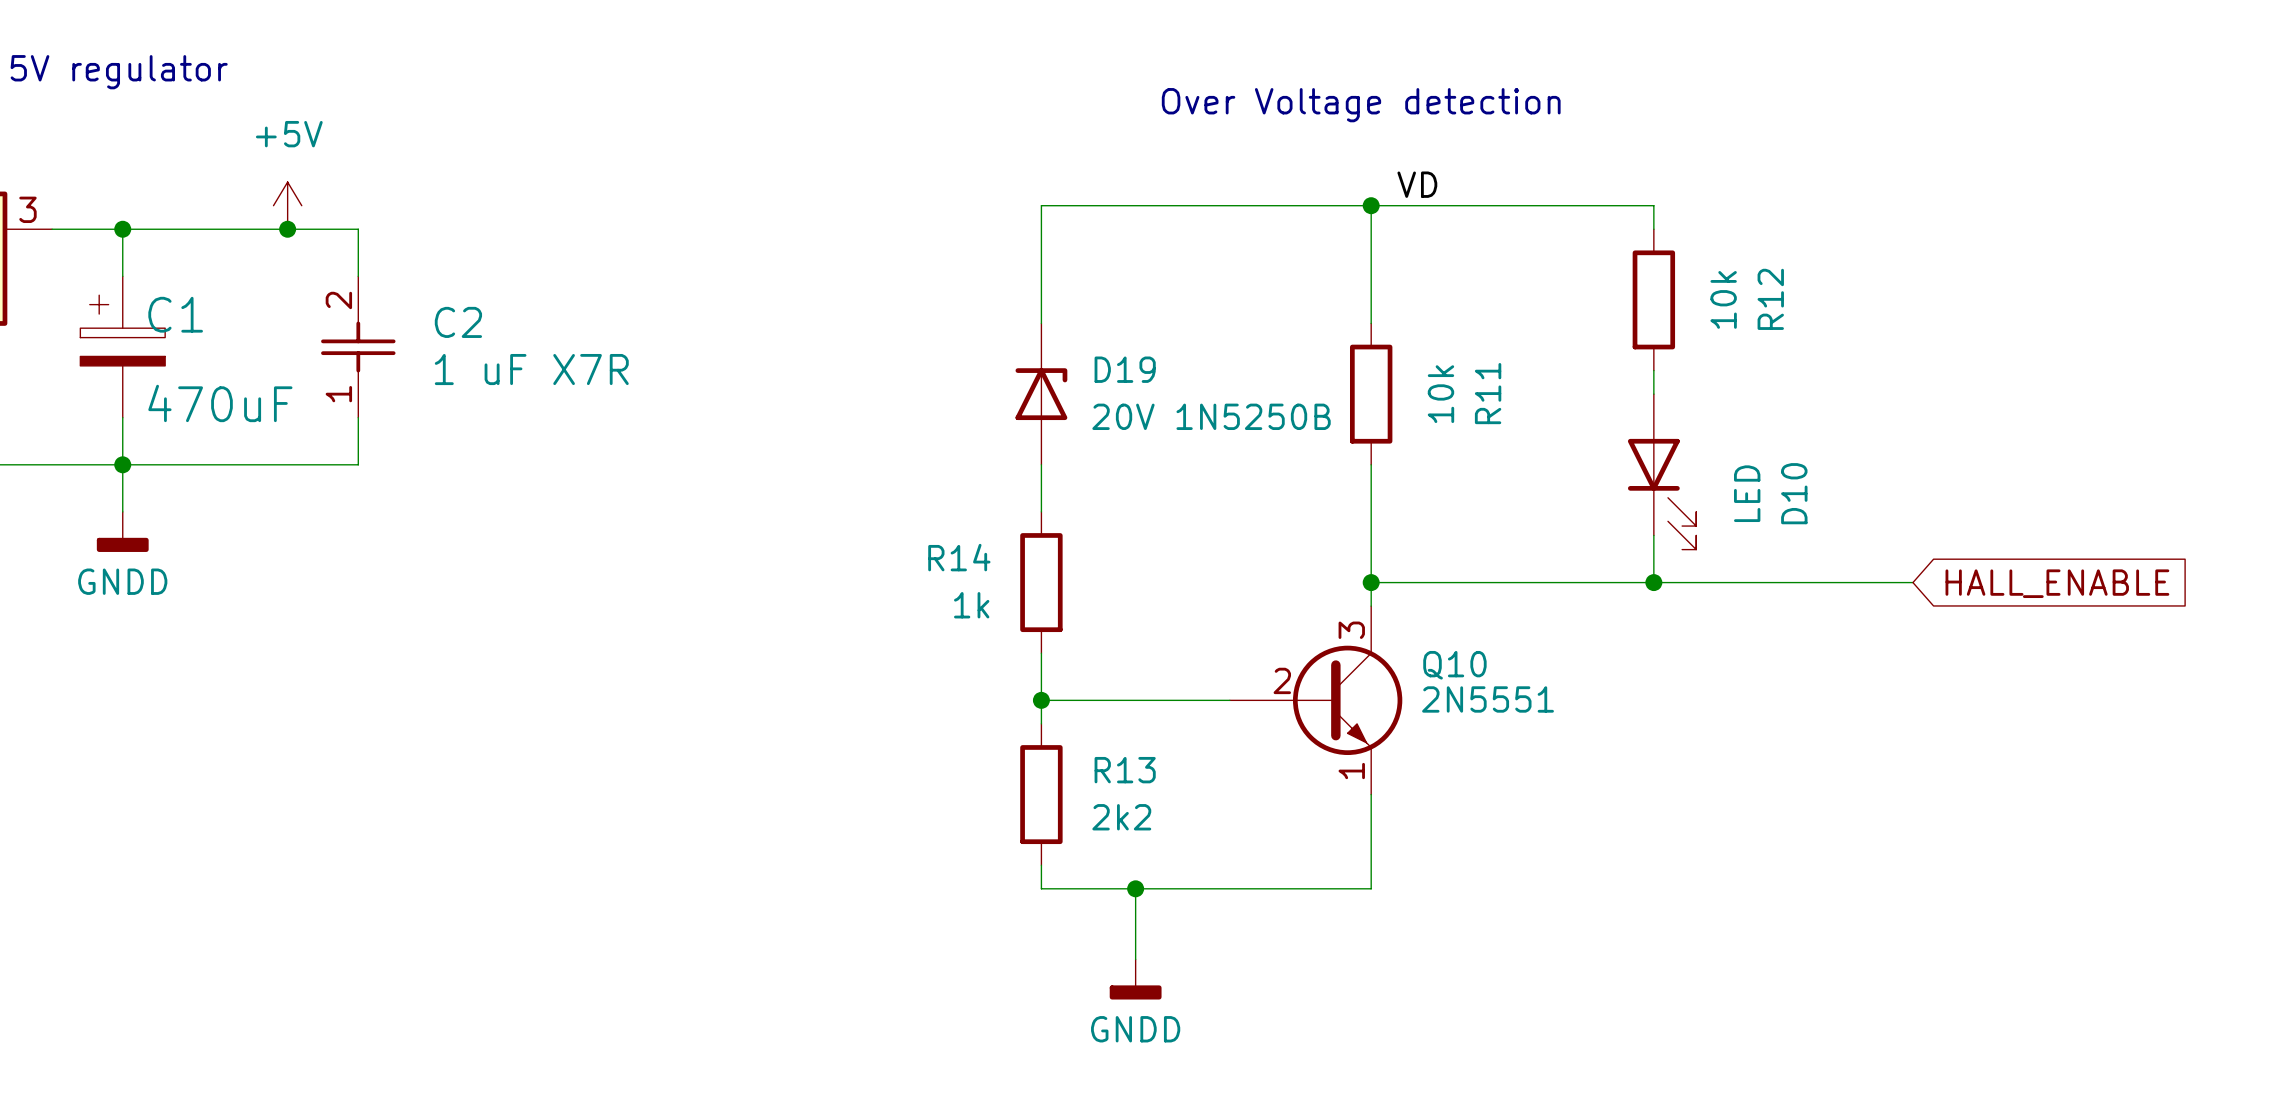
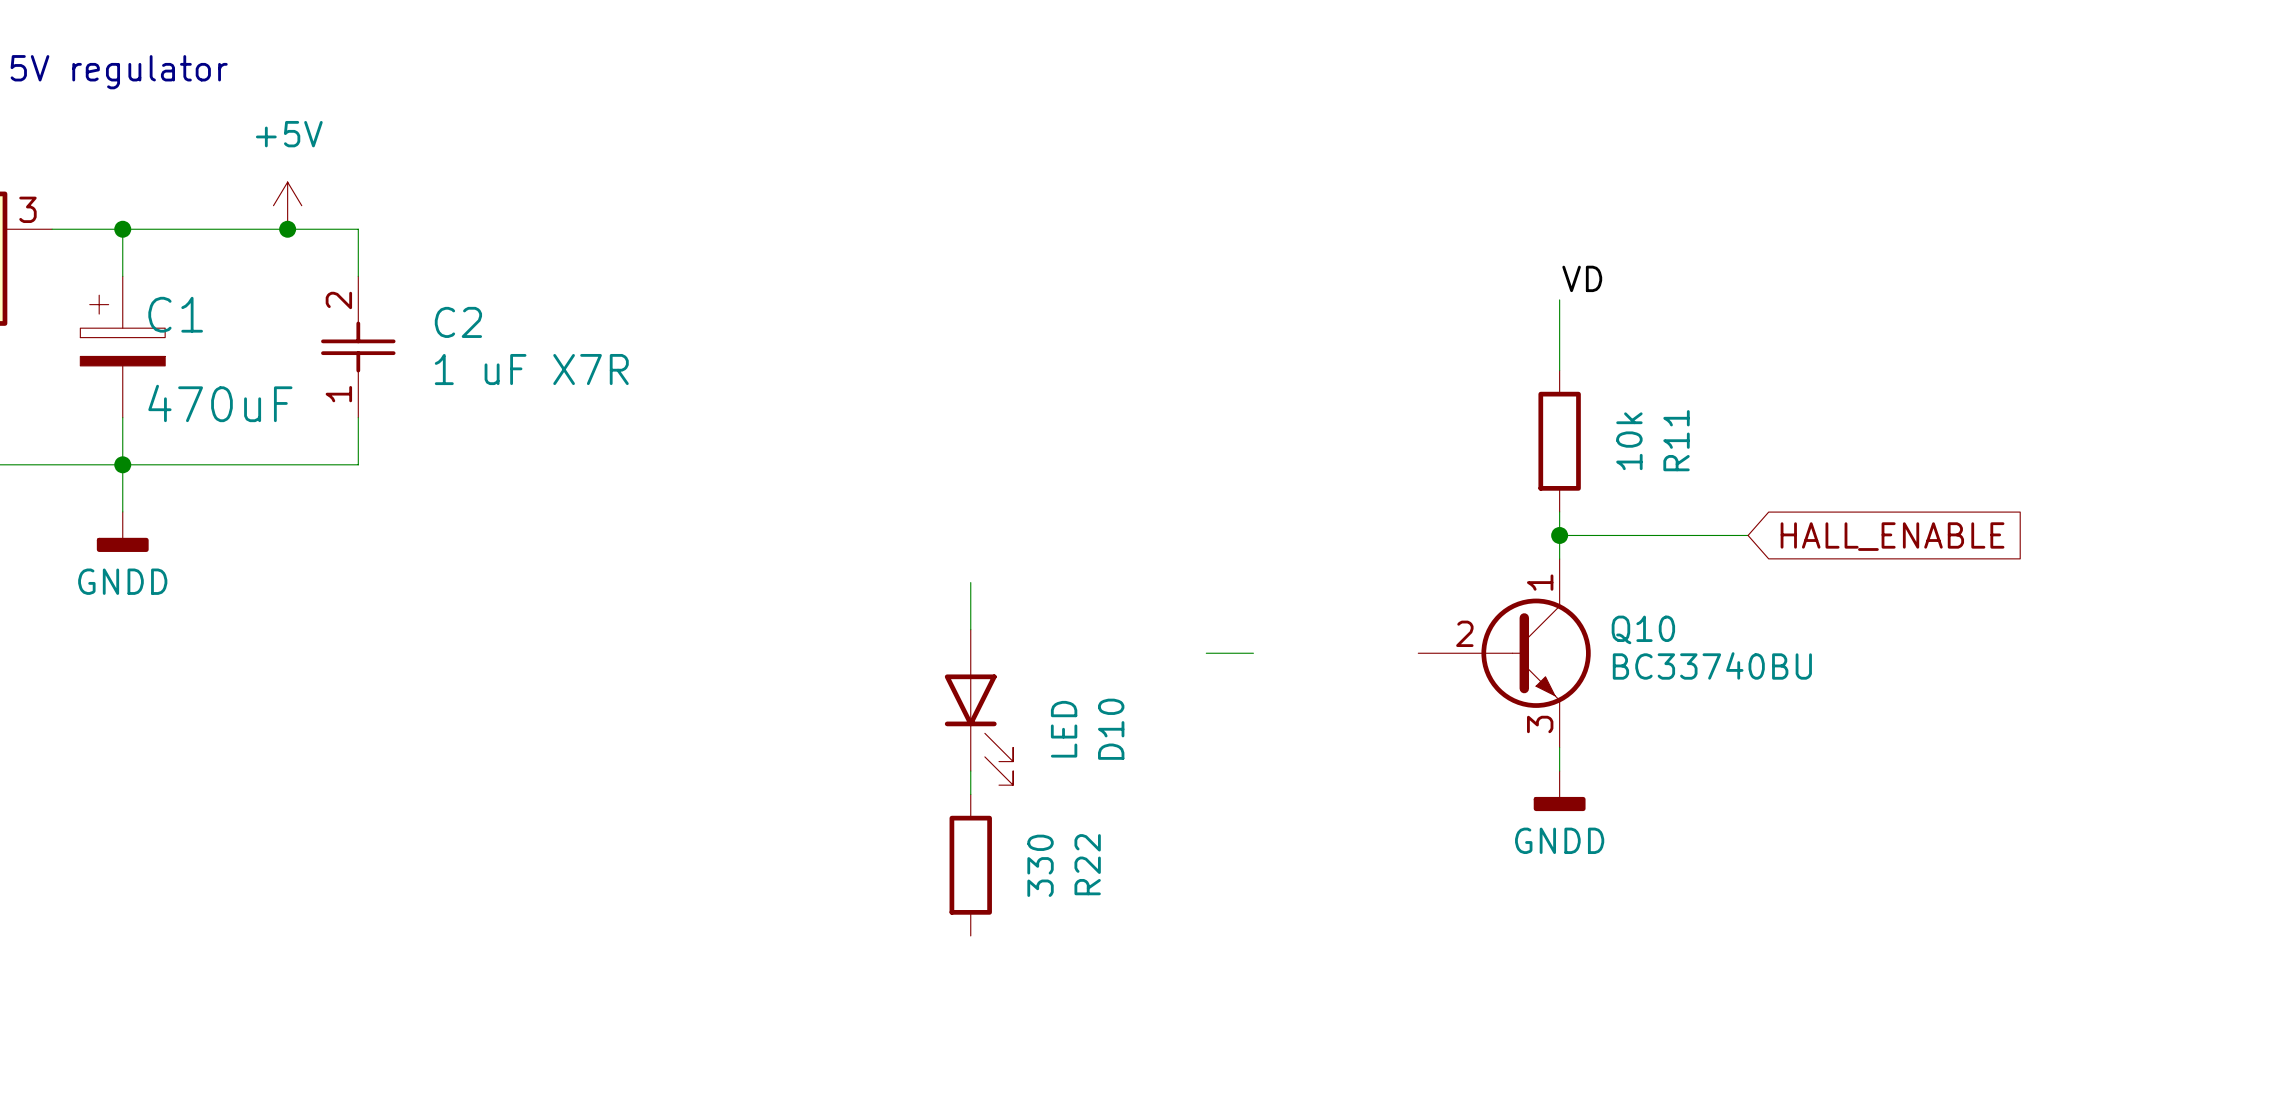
text: Over Voltage detection (1361, 105) -> none
label position: VD (1417, 184) -> VD (1582, 278)
wire: (1371, 205) (1371, 323) -> none
junction: (1371, 205) -> none
wire: (1653, 229) (1653, 205) (1041, 205) (1041, 323) -> none
wire: none -> (1559, 299) (1559, 370)
R12: 10k (1653, 299) -> none
wire: (1653, 370) (1653, 394) -> (1559, 747) (1559, 771)
D19: 20V 1N5250B (1041, 394) -> none
R11 position: (1371, 394) -> (1559, 441)
wire: (1041, 464) (1041, 511) -> (970, 582) (970, 629)
wire: (1371, 464) (1371, 606) -> none
D10 position: (1662, 471) -> (978, 707)
wire: none -> (1559, 535) (1748, 535)
junction: none -> (1559, 535)
wire: (1653, 535) (1653, 582) -> (1559, 511) (1559, 559)
R14: 1k (1041, 582) -> none
wire: (1371, 582) (1912, 582) -> none
junction: (1371, 582) -> none
junction: (1653, 582) -> none
global label position: HALL_ENABLE (2057, 583) -> HALL_ENABLE (1892, 536)
Q10 symbol: [1229, 606, 1403, 795] -> [1418, 559, 1591, 748]
wire: (1041, 653) (1041, 723) -> none
wire: none -> (1206, 653) (1253, 653)
Q10 value: 2N5551 (1488, 699) -> BC33740BU (1712, 665)
wire: (1041, 700) (1229, 700) -> none
junction: (1041, 700) -> none
wire: none -> (970, 771) (970, 794)
power symbol: none -> GNDD (1559, 791)
R13: 2k2 (1041, 794) -> none
wire: (1371, 794) (1371, 888) (1041, 888) (1041, 865) -> none
R22: none -> 330 (970, 865)
wire: (1135, 888) (1135, 959) -> none
junction: (1135, 888) -> none
power symbol: GNDD (1135, 979) -> none

